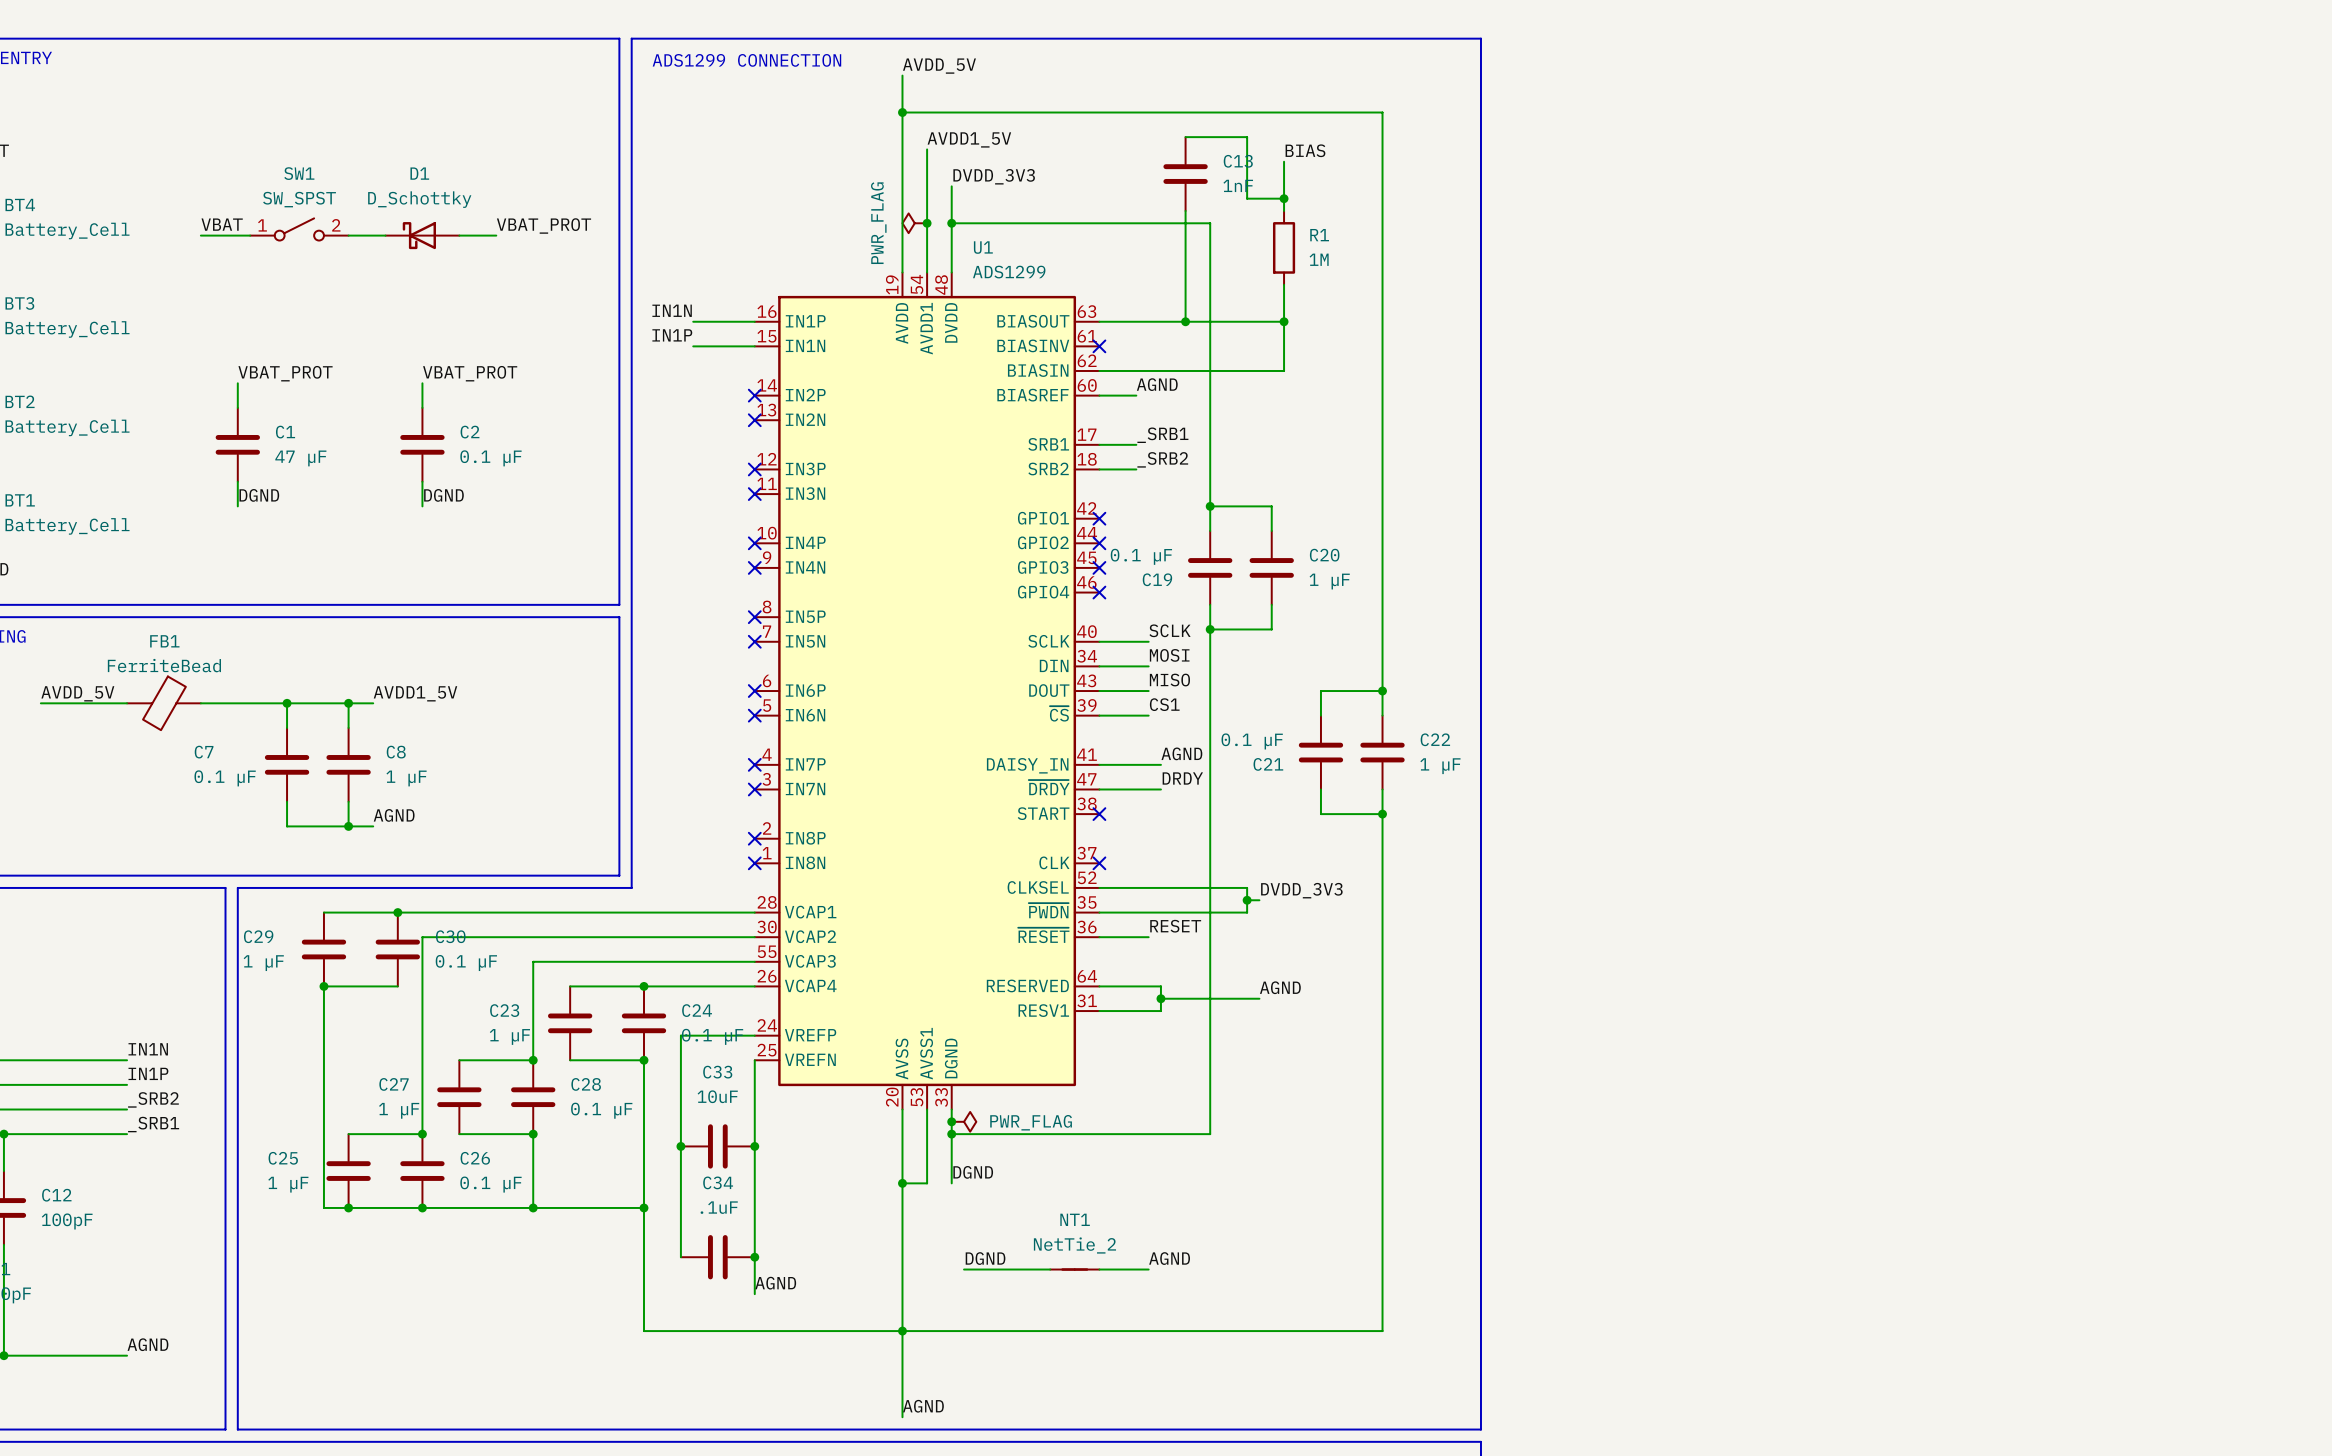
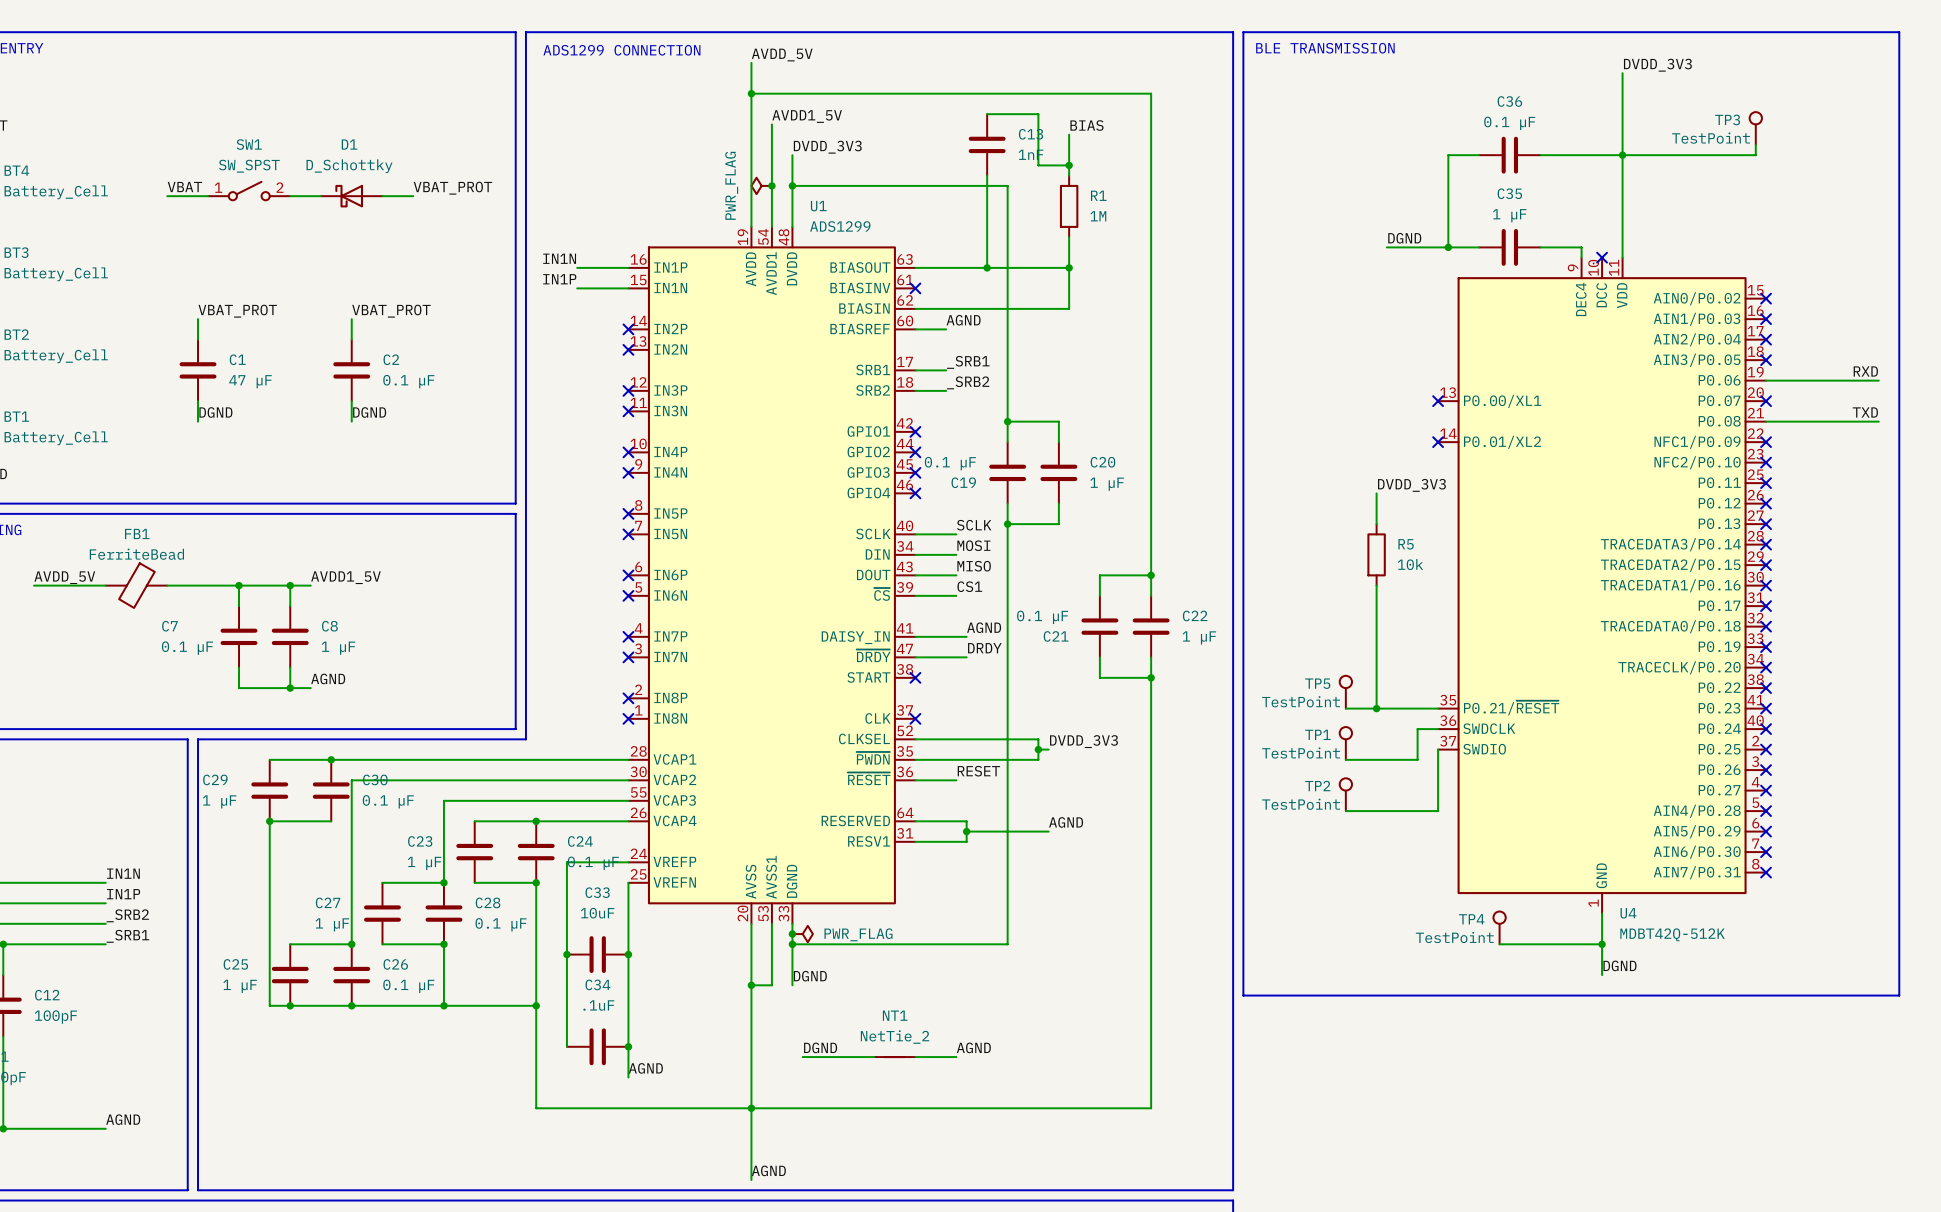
line: none -> (1243, 32) (1899, 32) (1899, 995) (1243, 995) (1243, 32)
text: none -> BLE TRANSMISSION (1325, 48)
label: none -> DVDD_3V3 (1657, 65)
wire: none -> (1622, 73) (1622, 257)
TP3: none -> TestPoint (1755, 128)
wire: none -> (1755, 144) (1755, 155) (1540, 155)
wire: none -> (1479, 155) (1448, 155) (1448, 247)
C36: none -> 0.1 µF (1509, 155)
junction: none -> (1622, 155)
label: none -> DGND (1404, 238)
wire: none -> (1386, 247) (1479, 247)
junction: none -> (1448, 247)
C35: none -> 1 µF (1509, 247)
wire: none -> (1540, 247) (1581, 247) (1581, 257)
no-connect mark: none -> (1602, 257)
no-connect mark: none -> (1766, 298)
no-connect mark: none -> (1766, 319)
no-connect mark: none -> (1766, 339)
no-connect mark: none -> (1766, 360)
label: none -> RXD (1865, 371)
wire: none -> (1766, 380) (1878, 380)
no-connect mark: none -> (1438, 401)
no-connect mark: none -> (1766, 401)
label: none -> TXD (1865, 412)
wire: none -> (1766, 421) (1878, 421)
no-connect mark: none -> (1438, 442)
no-connect mark: none -> (1766, 442)
no-connect mark: none -> (1766, 462)
no-connect mark: none -> (1766, 483)
label: none -> DVDD_3V3 (1411, 485)
wire: none -> (1376, 493) (1376, 524)
no-connect mark: none -> (1766, 503)
no-connect mark: none -> (1766, 524)
no-connect mark: none -> (1766, 544)
R5: none -> 10k (1376, 554)
no-connect mark: none -> (1766, 565)
wire: none -> (1376, 585) (1376, 708)
U4: none -> MDBT42Q-512K (1602, 585)
no-connect mark: none -> (1766, 585)
no-connect mark: none -> (1766, 606)
no-connect mark: none -> (1766, 626)
no-connect mark: none -> (1766, 647)
no-connect mark: none -> (1766, 667)
no-connect mark: none -> (1766, 688)
TP5: none -> TestPoint (1345, 692)
wire: none -> (1345, 708) (1438, 708)
junction: none -> (1376, 708)
no-connect mark: none -> (1766, 708)
wire: none -> (1438, 729) (1417, 729) (1417, 759) (1345, 759)
no-connect mark: none -> (1766, 729)
TP1: none -> TestPoint (1345, 743)
wire: none -> (1438, 749) (1438, 811) (1345, 811)
no-connect mark: none -> (1766, 749)
no-connect mark: none -> (1766, 770)
no-connect mark: none -> (1766, 790)
TP2: none -> TestPoint (1345, 794)
no-connect mark: none -> (1766, 811)
no-connect mark: none -> (1766, 831)
no-connect mark: none -> (1766, 852)
no-connect mark: none -> (1766, 872)
wire: none -> (1602, 913) (1602, 975)
TP4: none -> TestPoint (1499, 927)
wire: none -> (1499, 944) (1602, 944)
junction: none -> (1602, 944)
label: none -> DGND (1619, 965)

